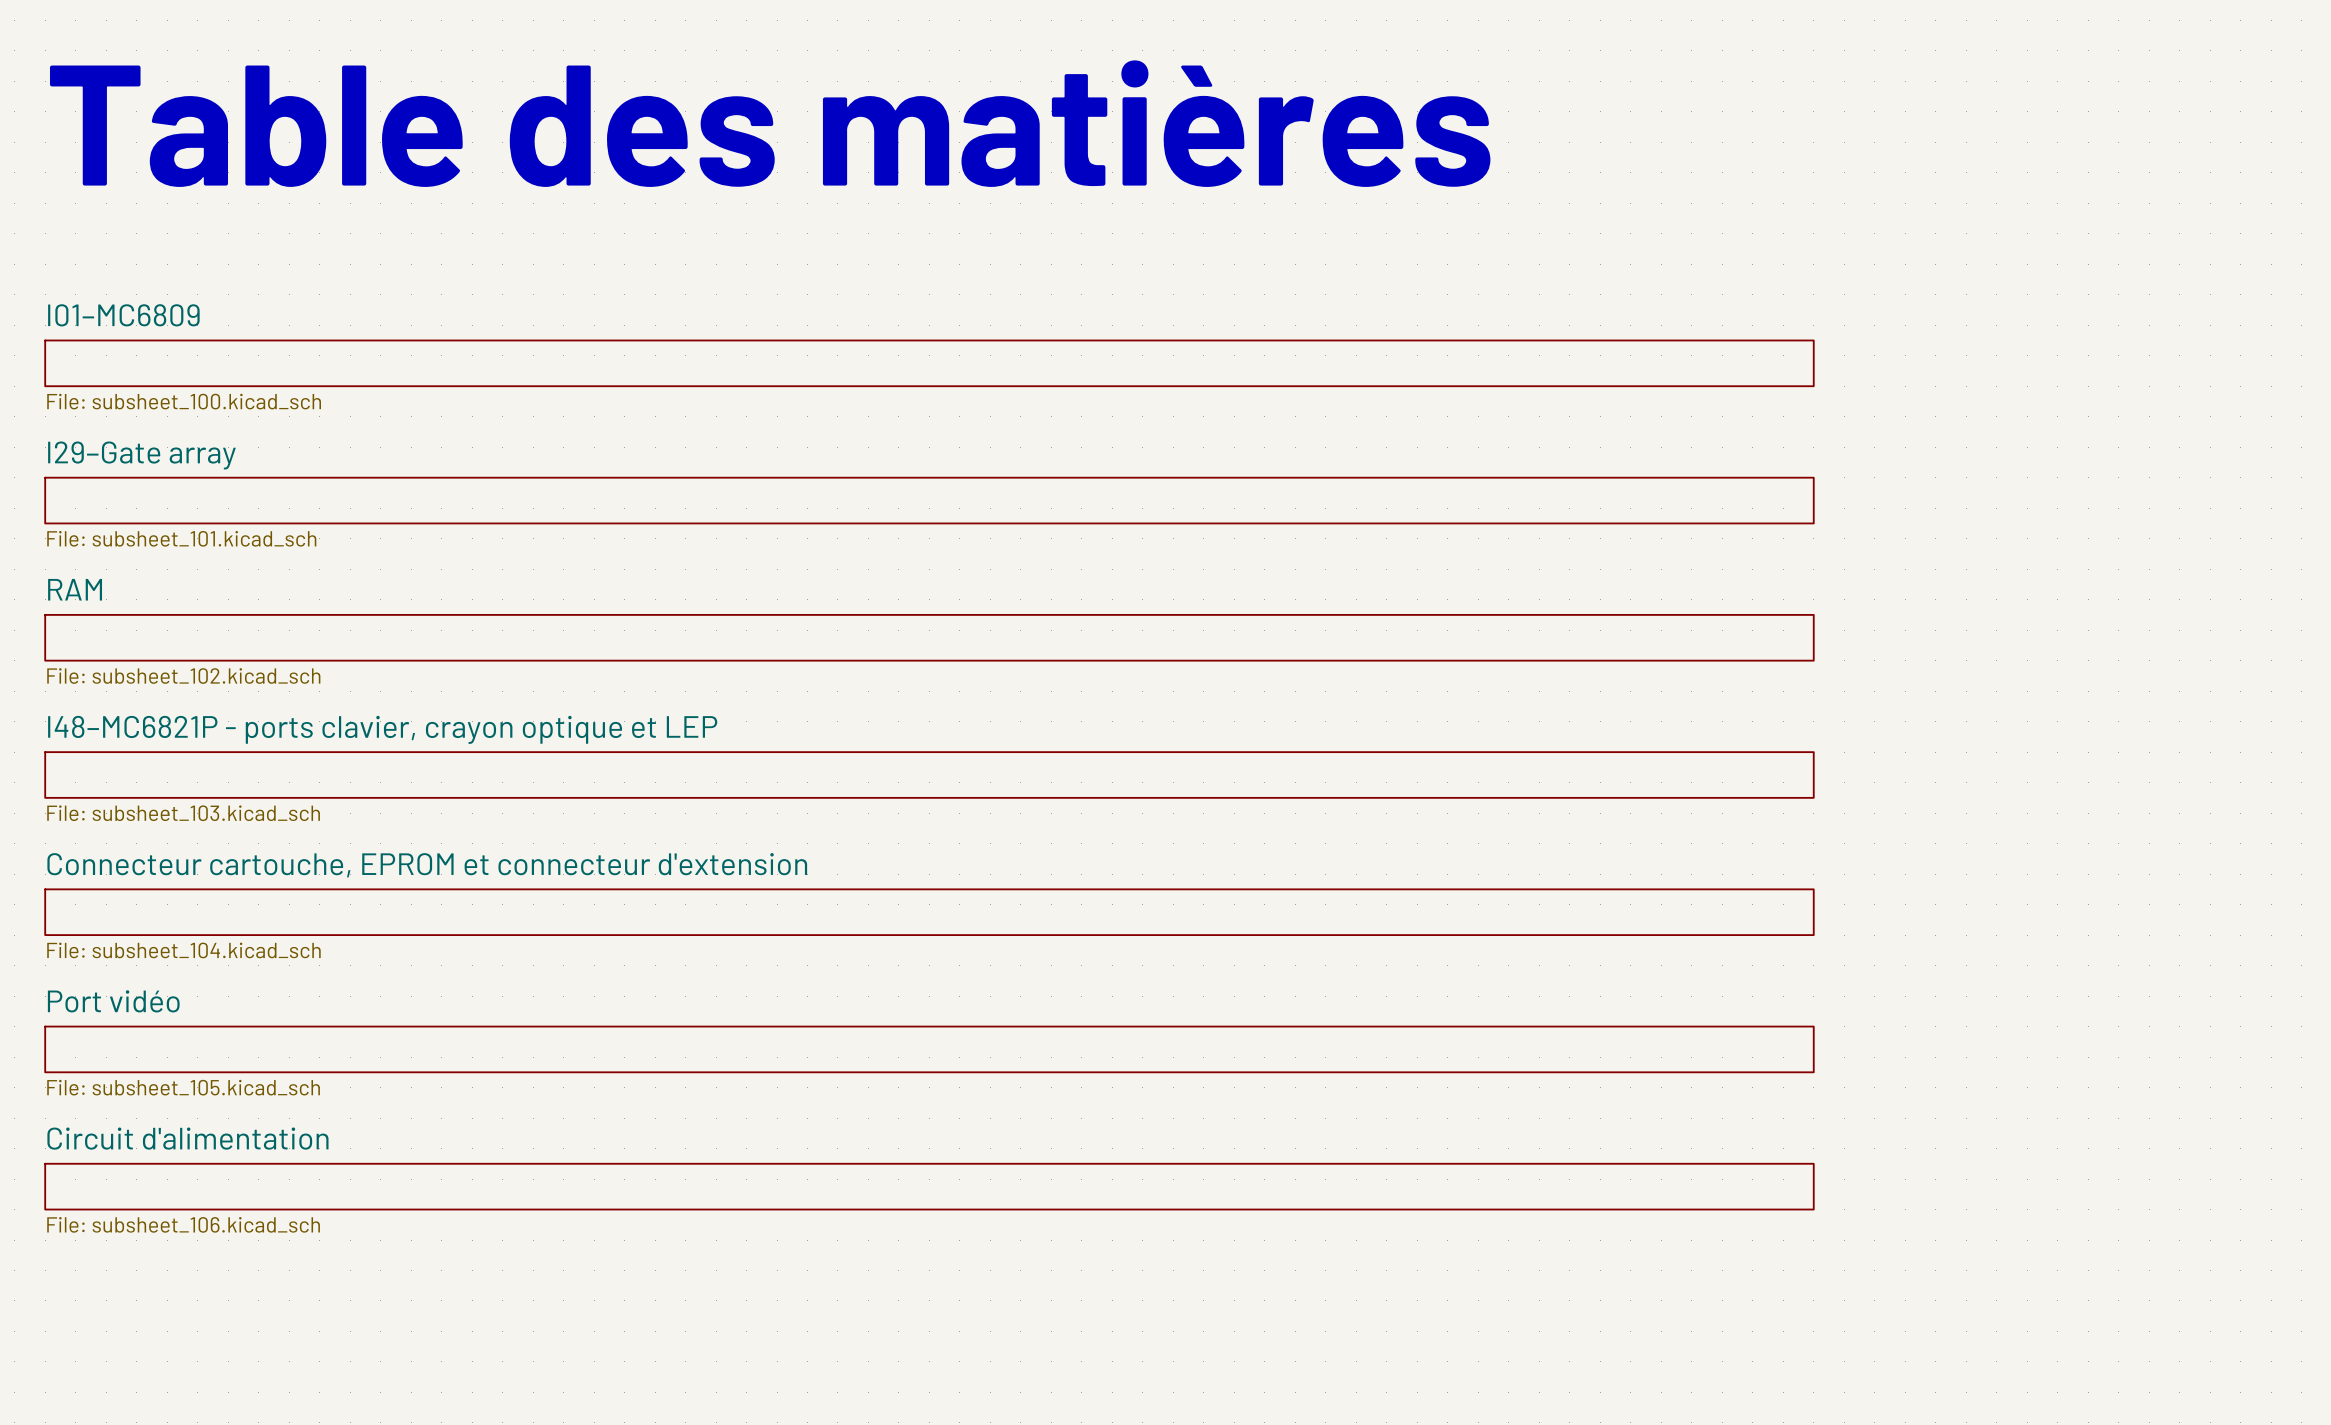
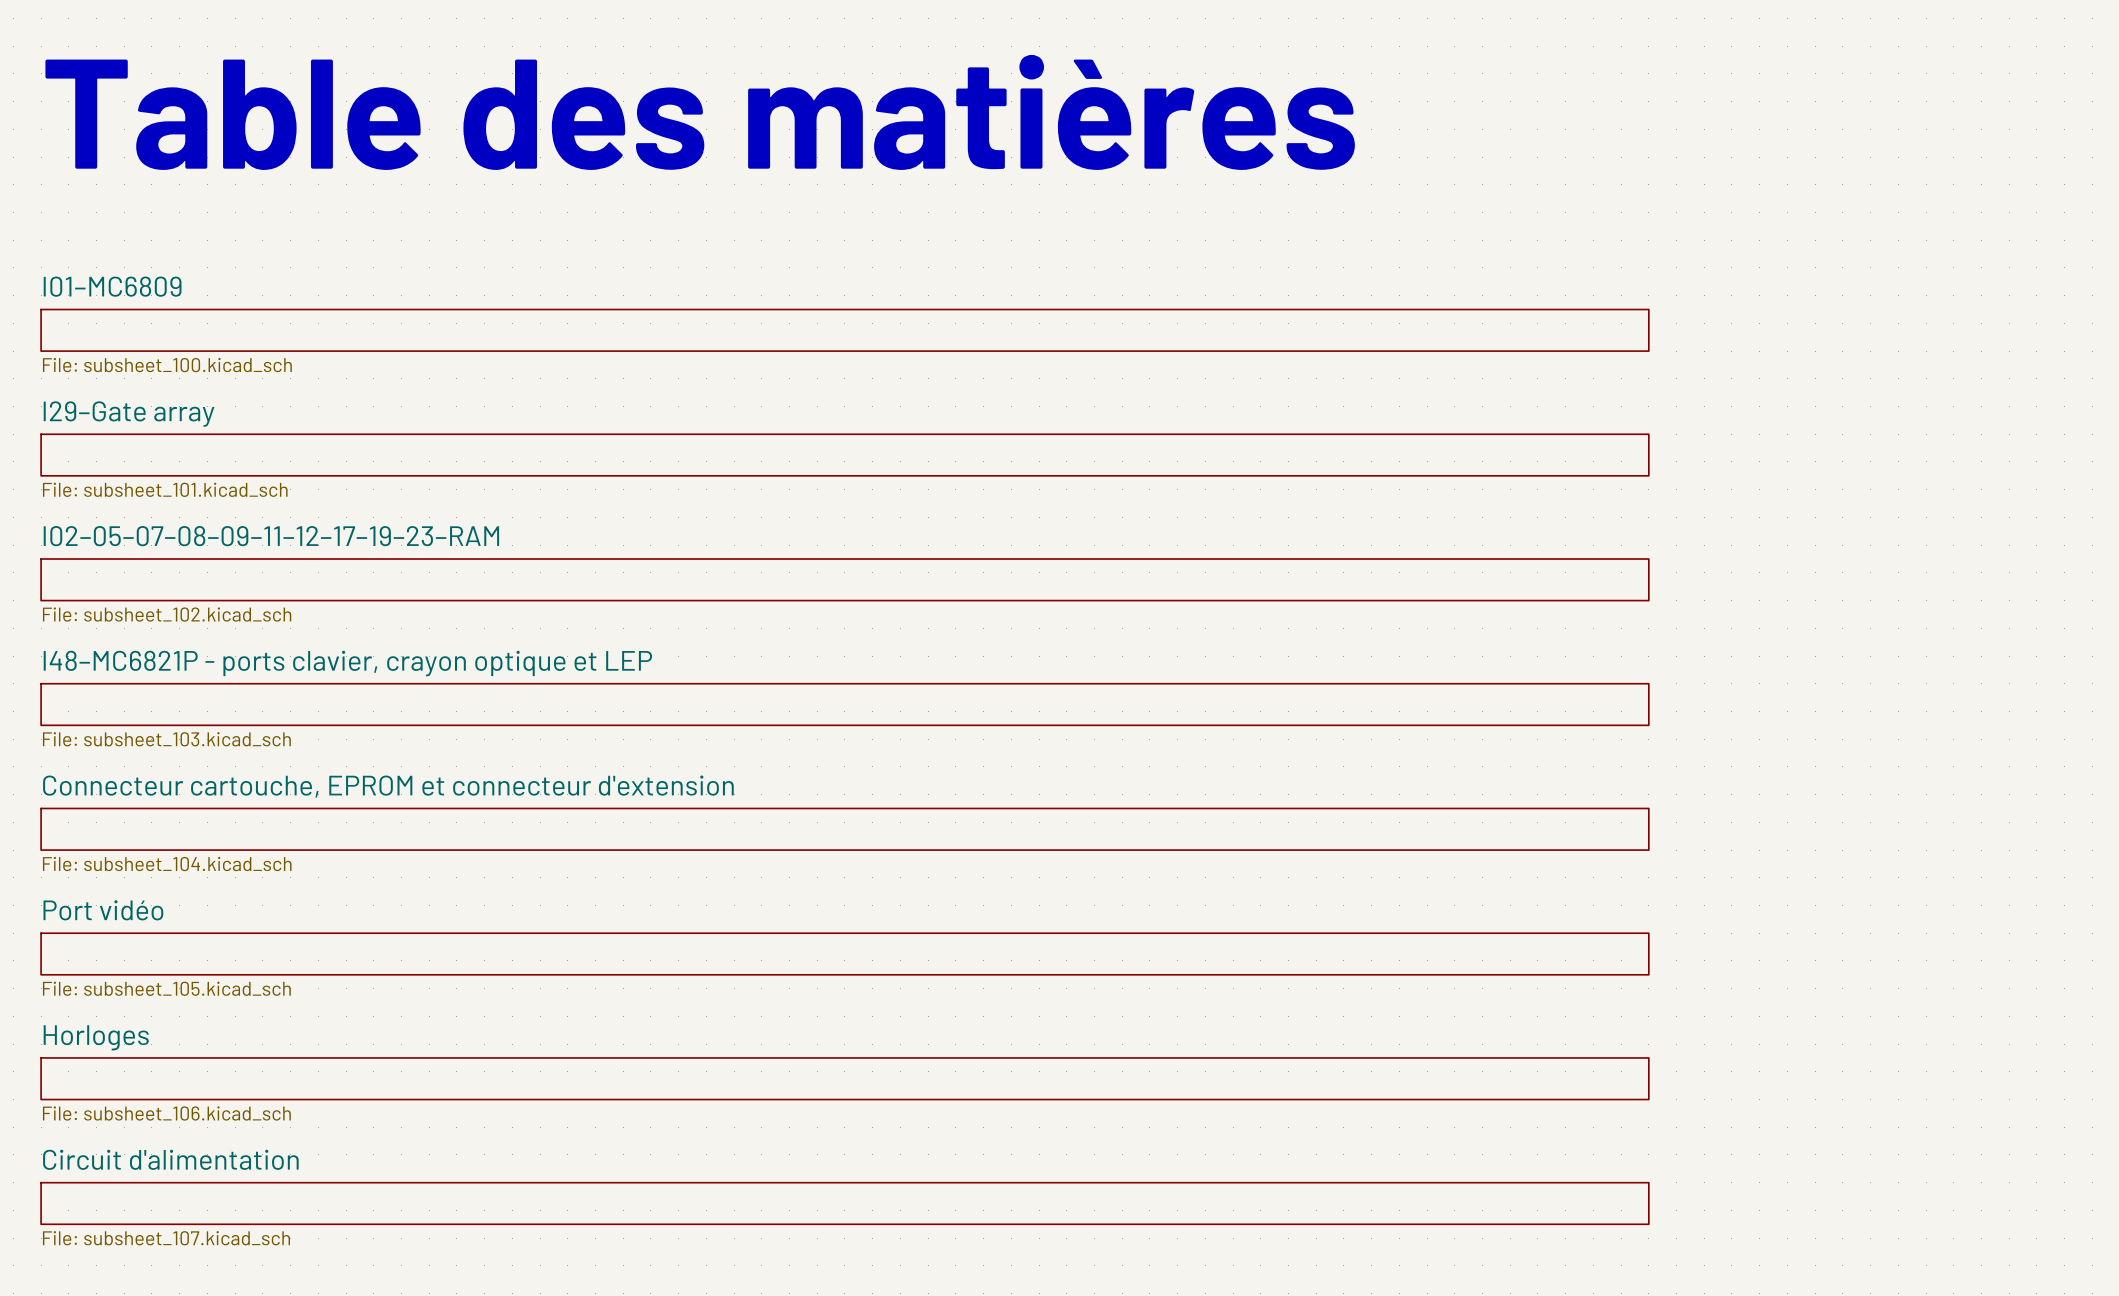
sheet RAM name: RAM (75, 589) -> I02–05–07–08–09–11–12–17–19–23–RAM (271, 536)
sheet Circuit d'alimentation name: Circuit d'alimentation (187, 1138) -> Horloges (96, 1037)
sheet Circuit d'alimentation: none -> File: subsheet_107.kicad_sch (844, 1203)

